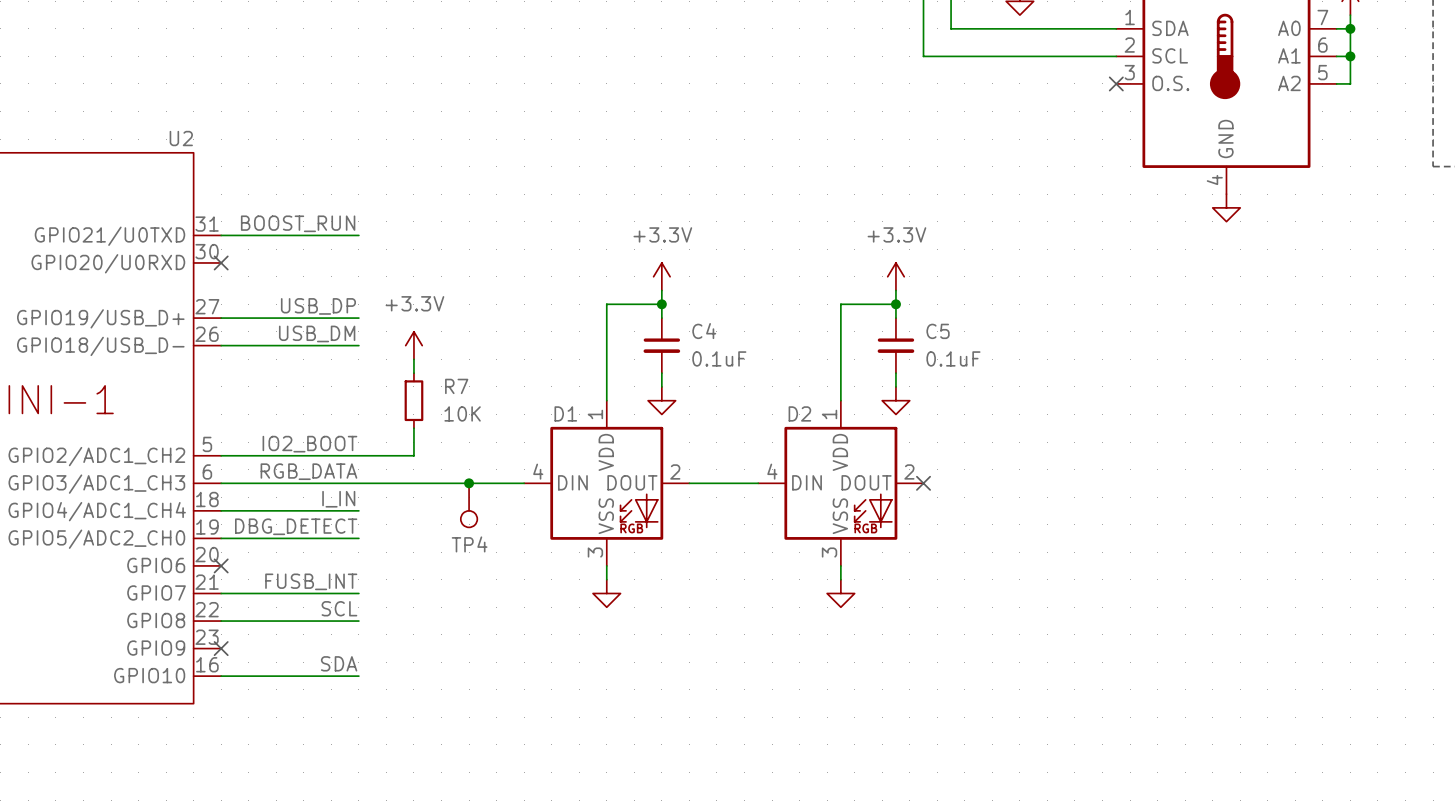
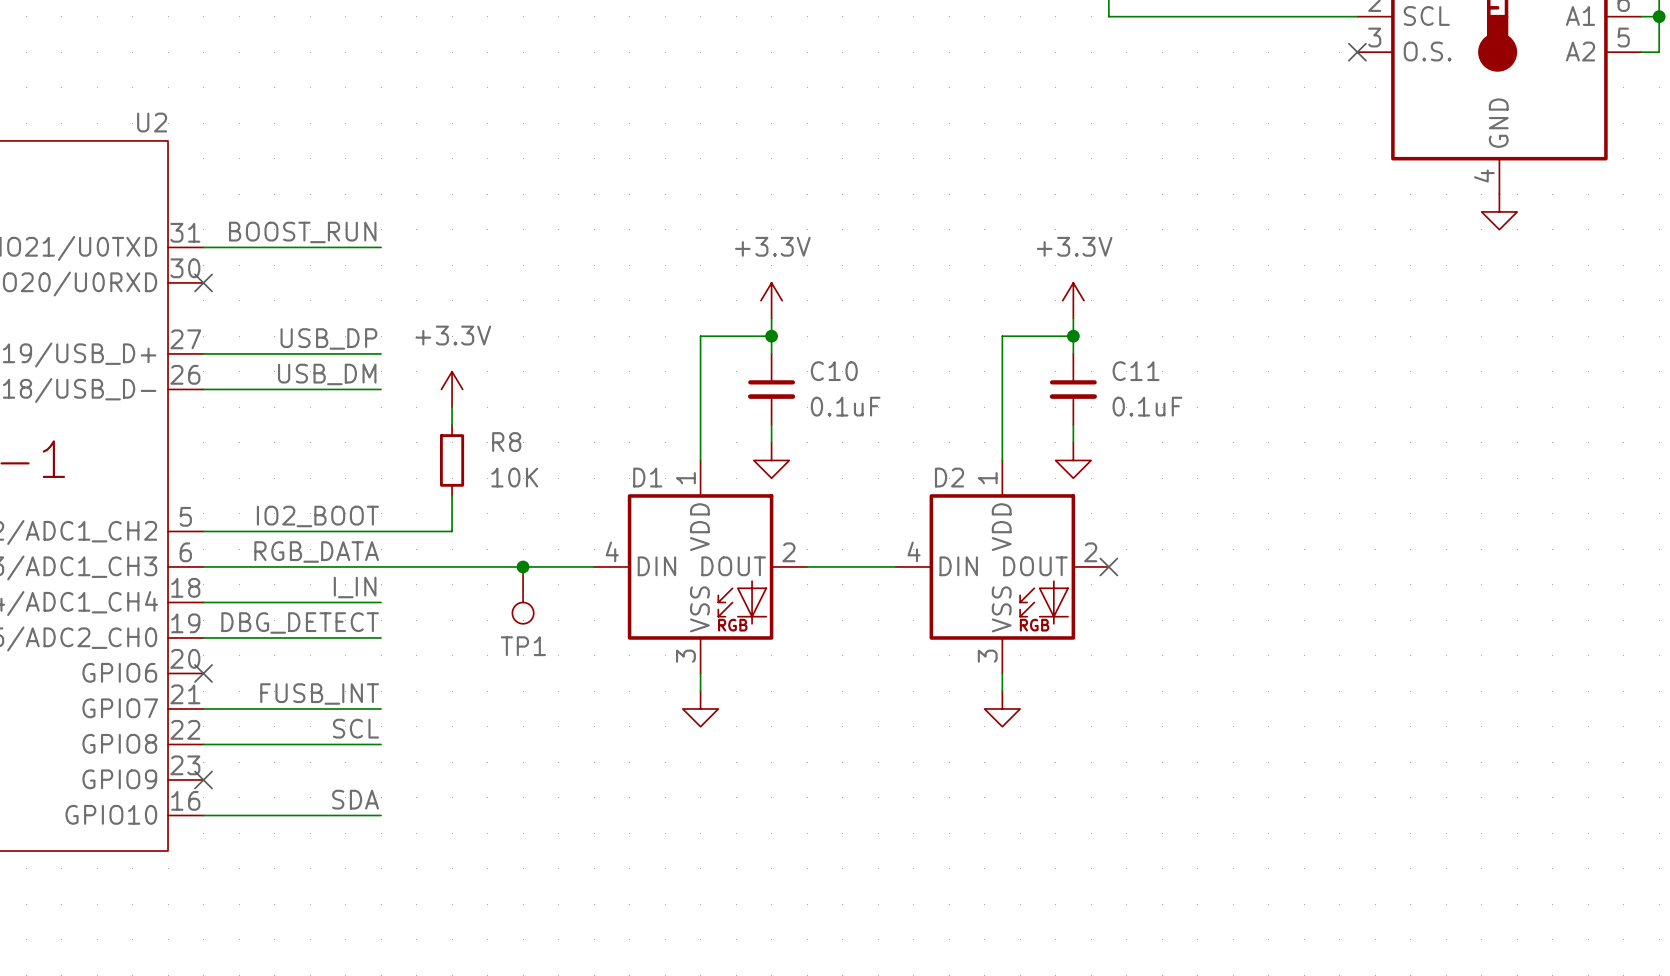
C4 name: C4 (704, 331) -> C10 (834, 371)
C5 name: C5 (938, 331) -> C11 (1136, 371)
R7 name: R7 (456, 386) -> R8 (506, 442)
TP4 name: TP4 (469, 544) -> TP1 (523, 646)

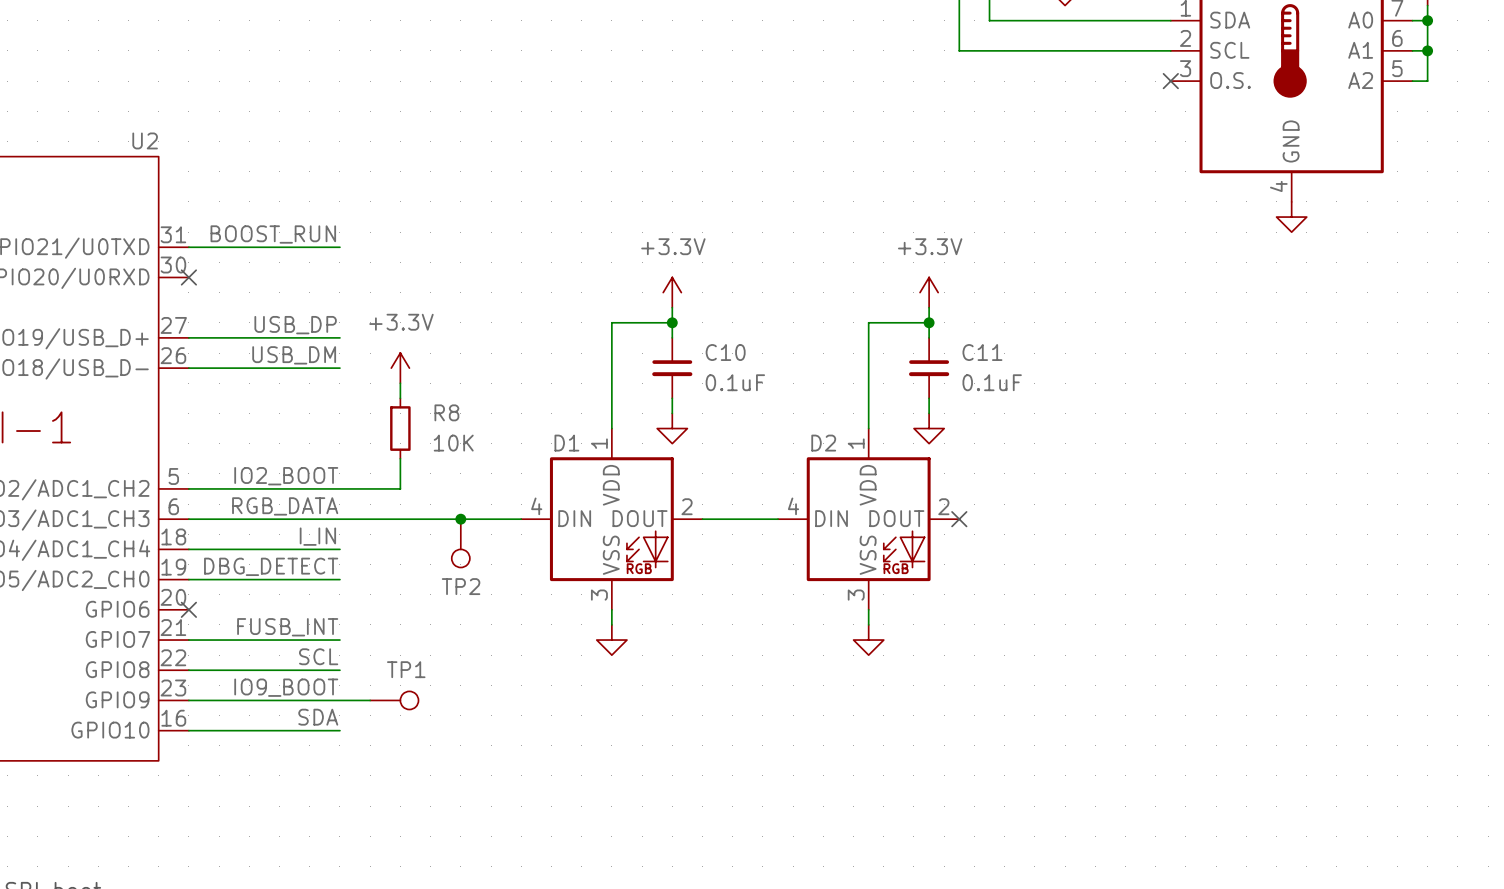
TP1 name: TP1 (523, 646) -> TP2 (461, 586)
label: none -> IO9_BOOT (286, 687)
wire: none -> (188, 700) (370, 700)
no-connect mark: (203, 780) -> none
TP1: none -> (394, 700)

